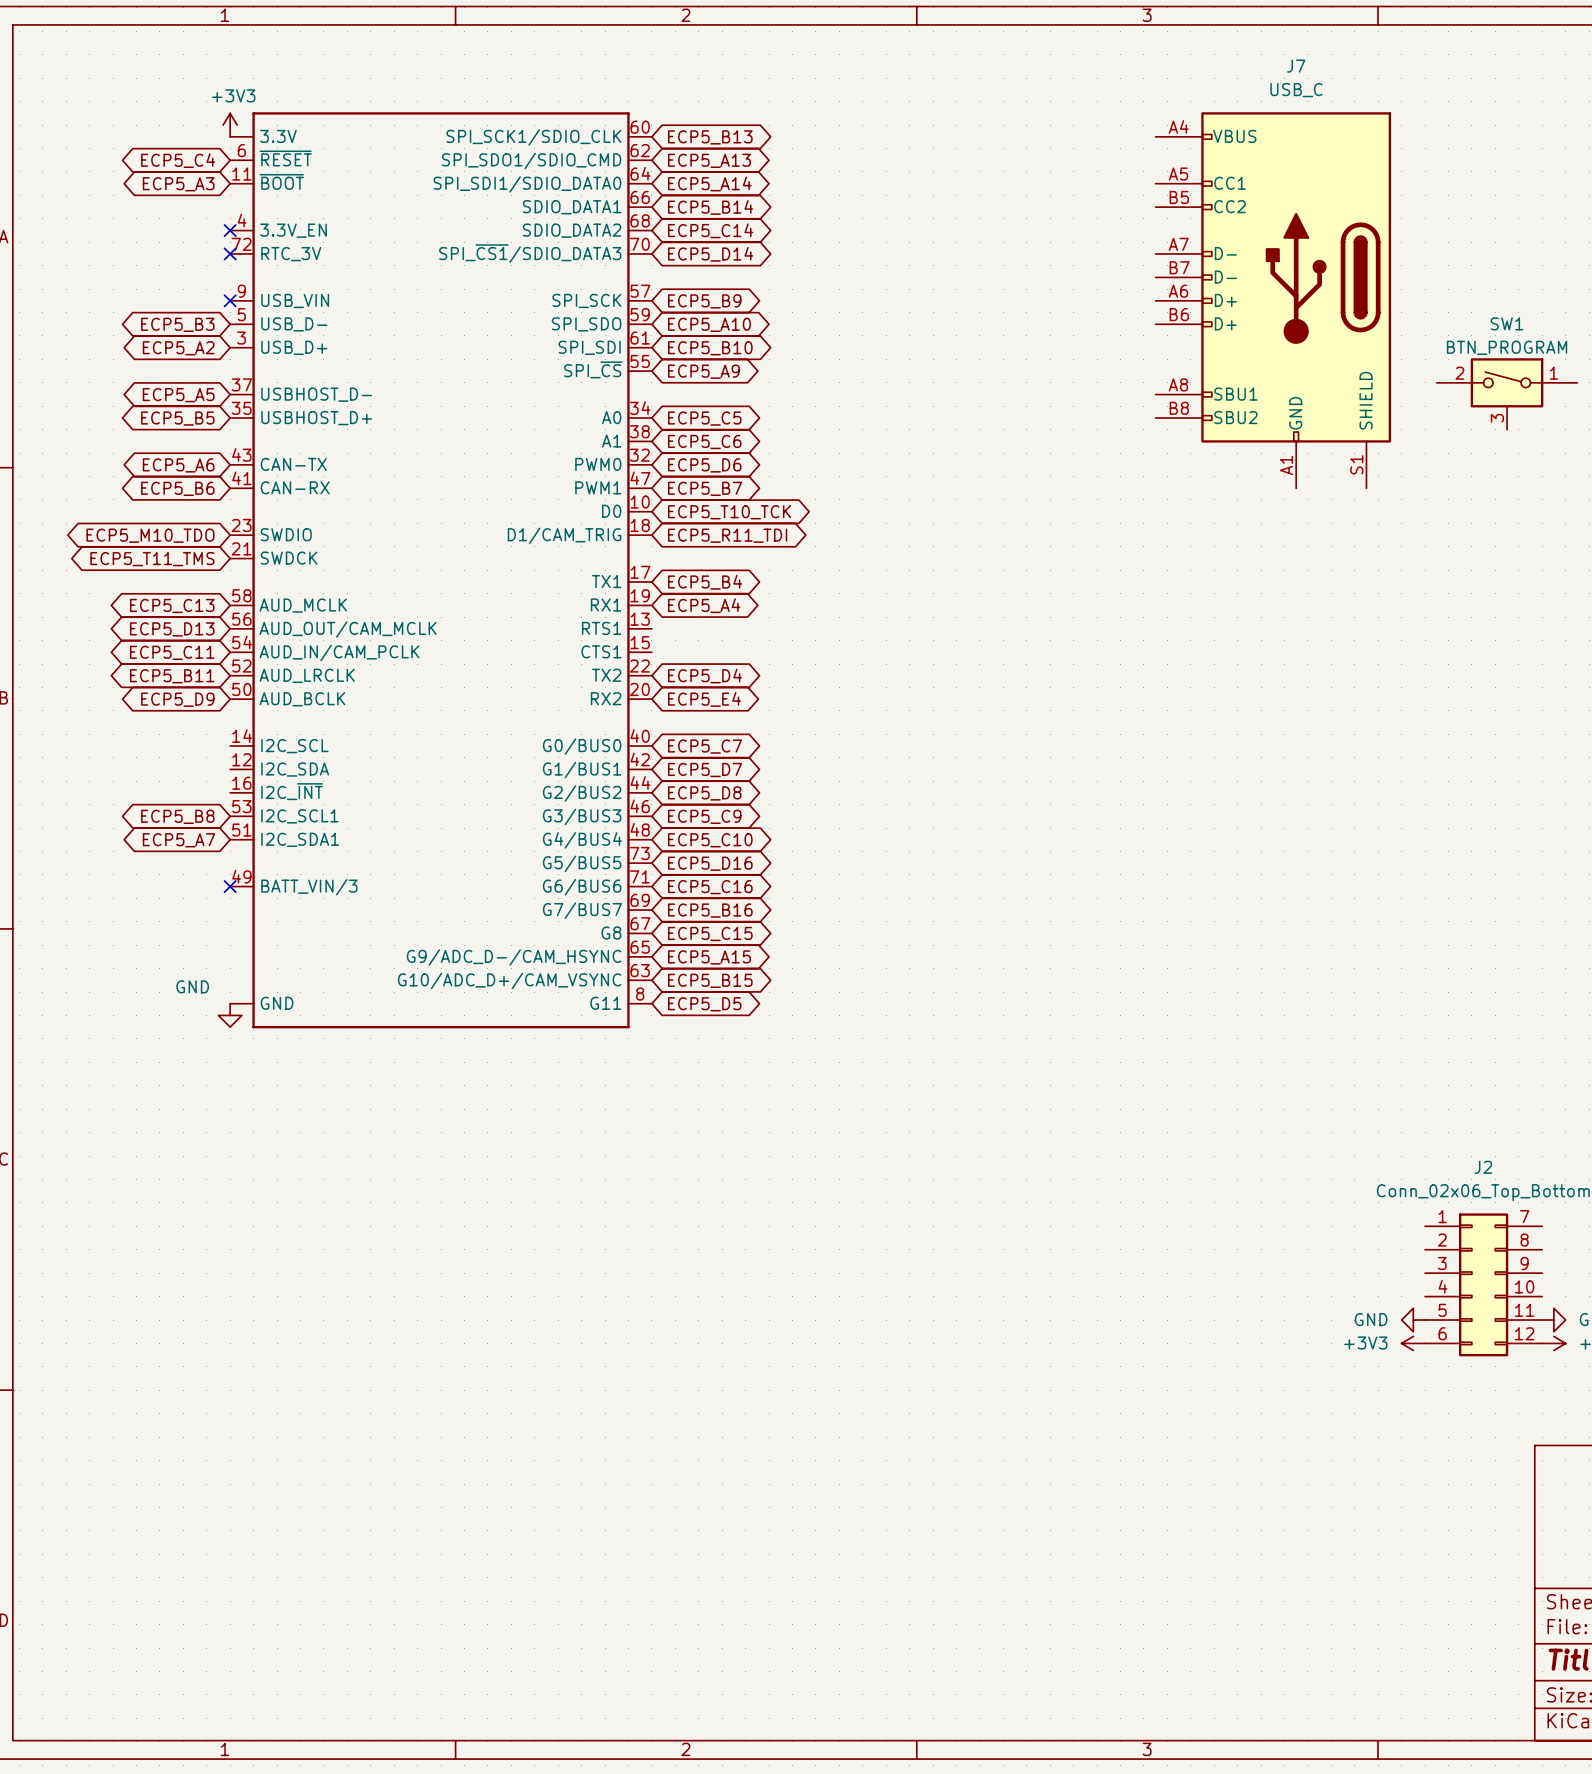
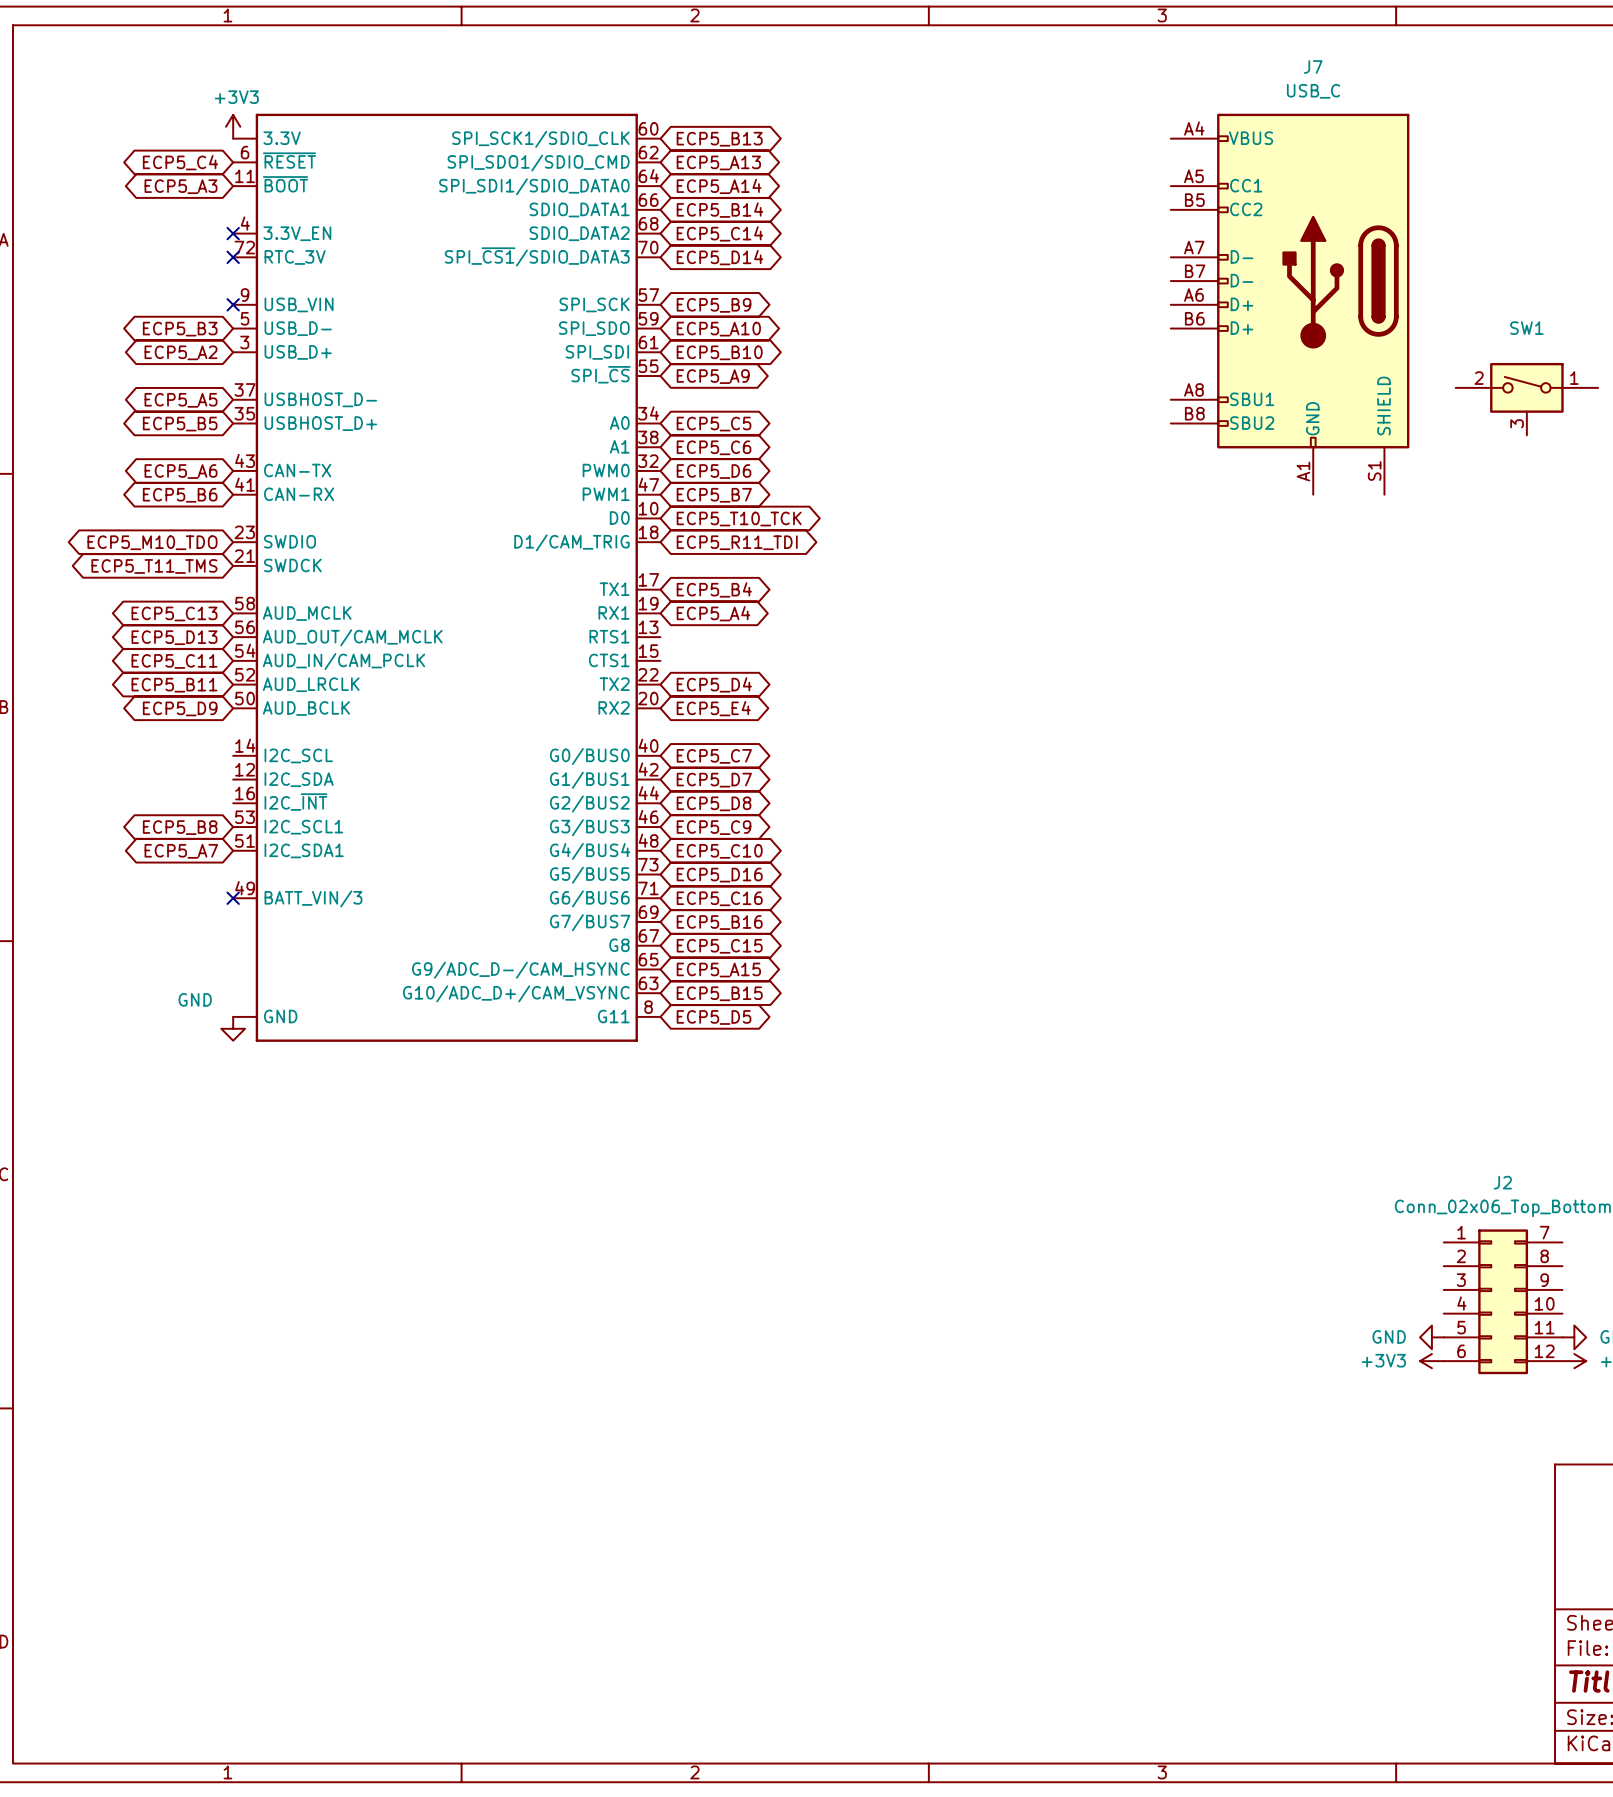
SW1 value: BTN_PROGRAM (1507, 347) -> none

